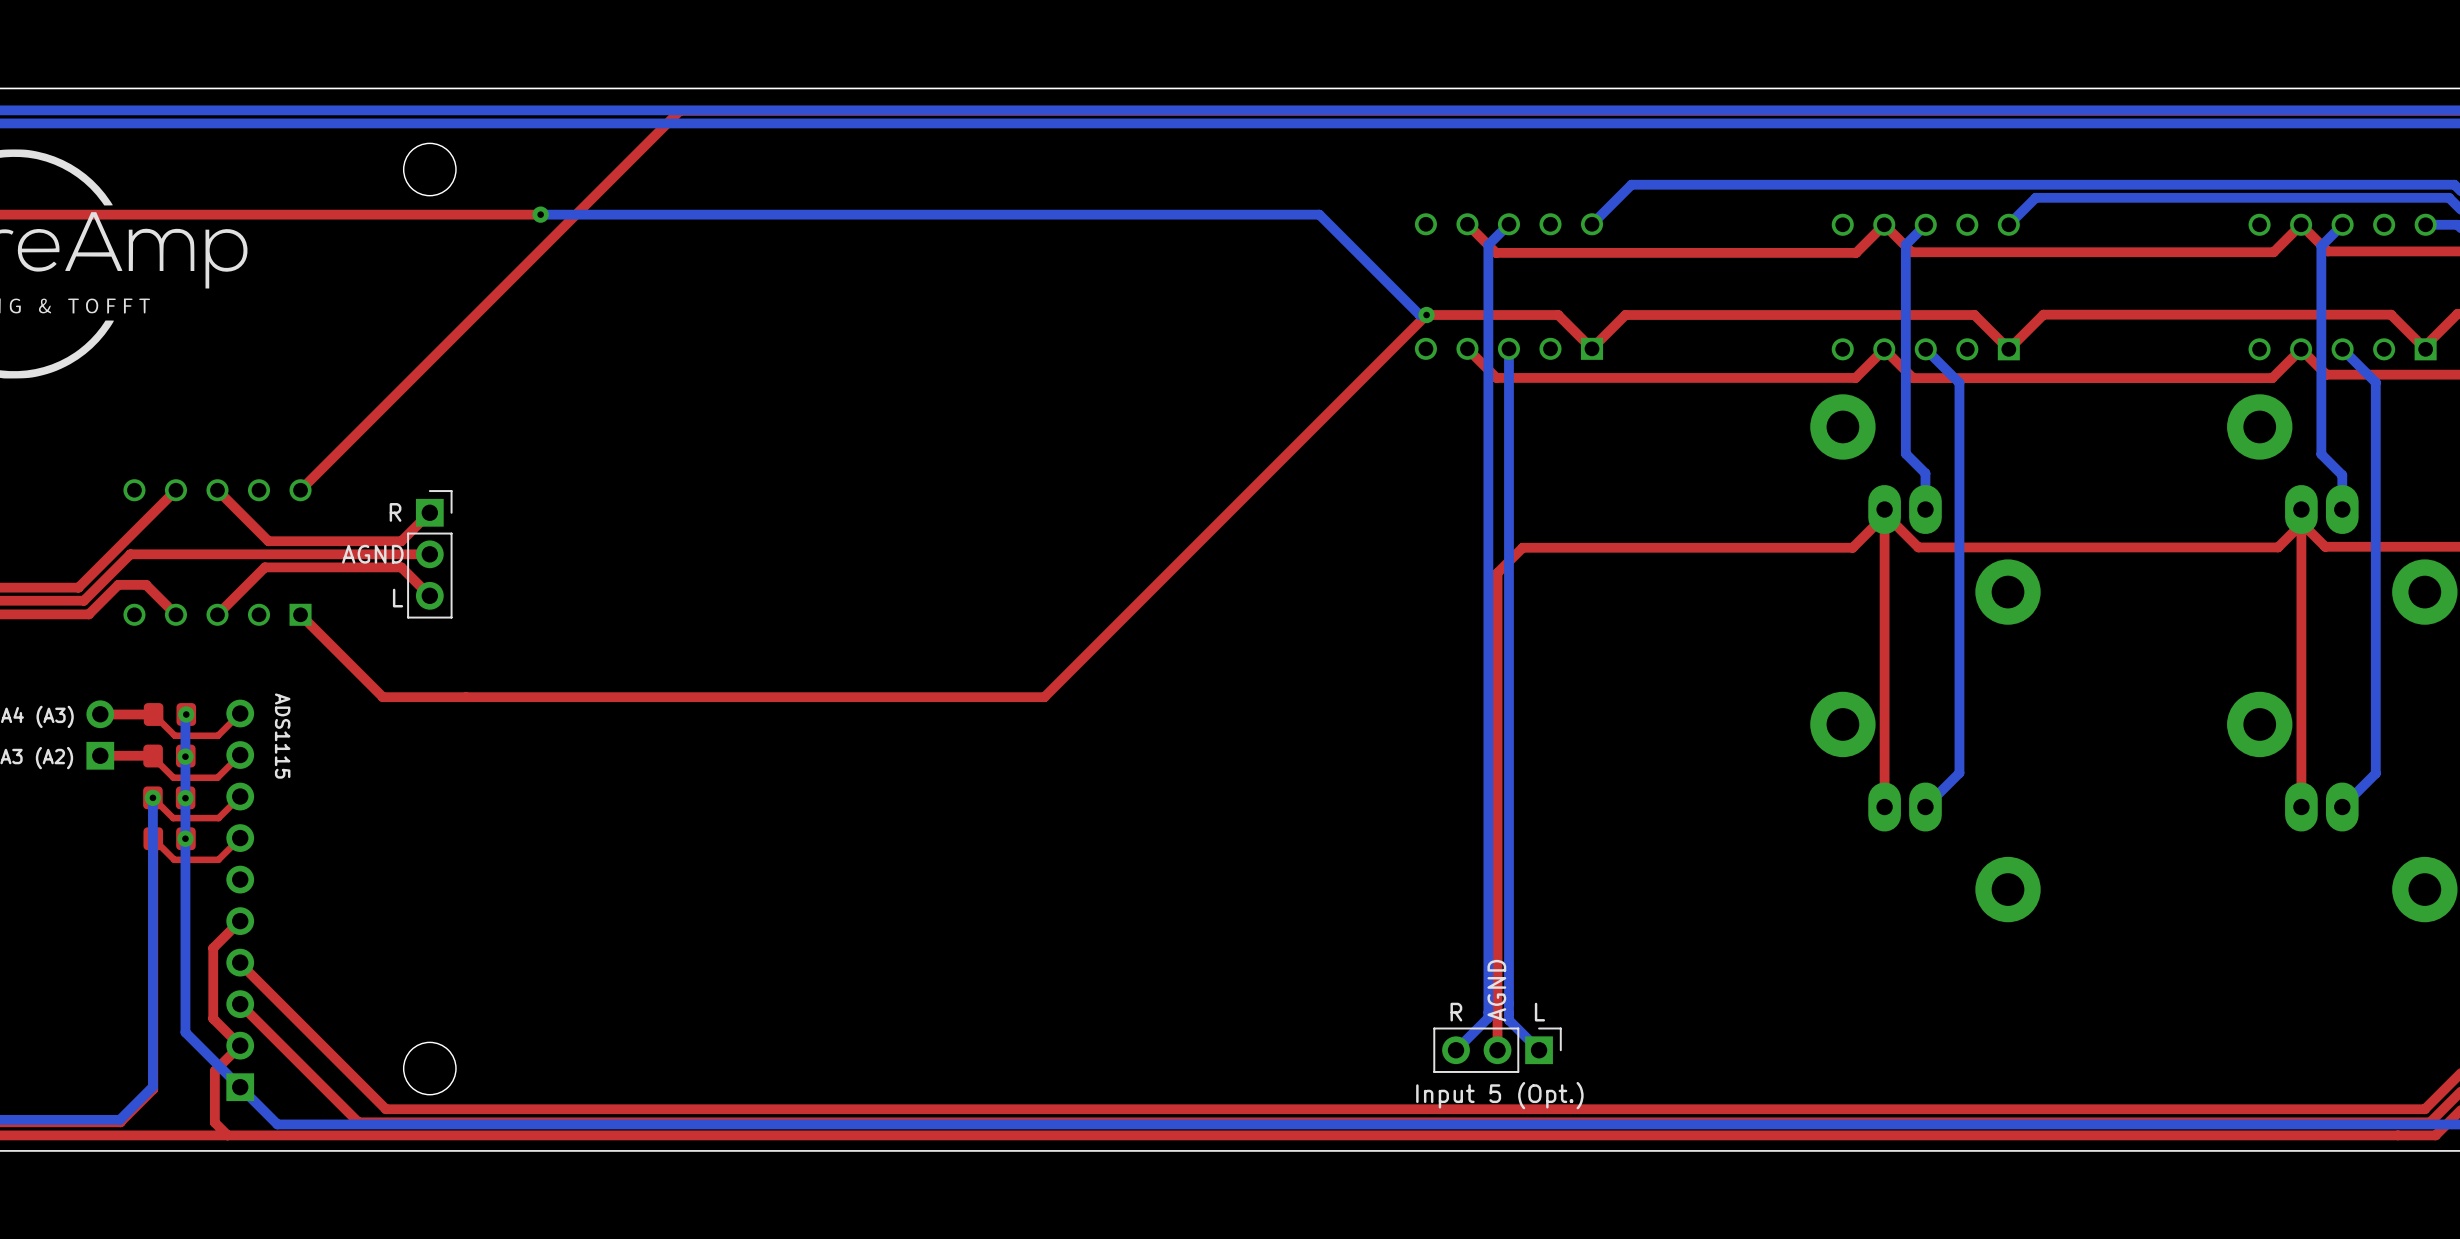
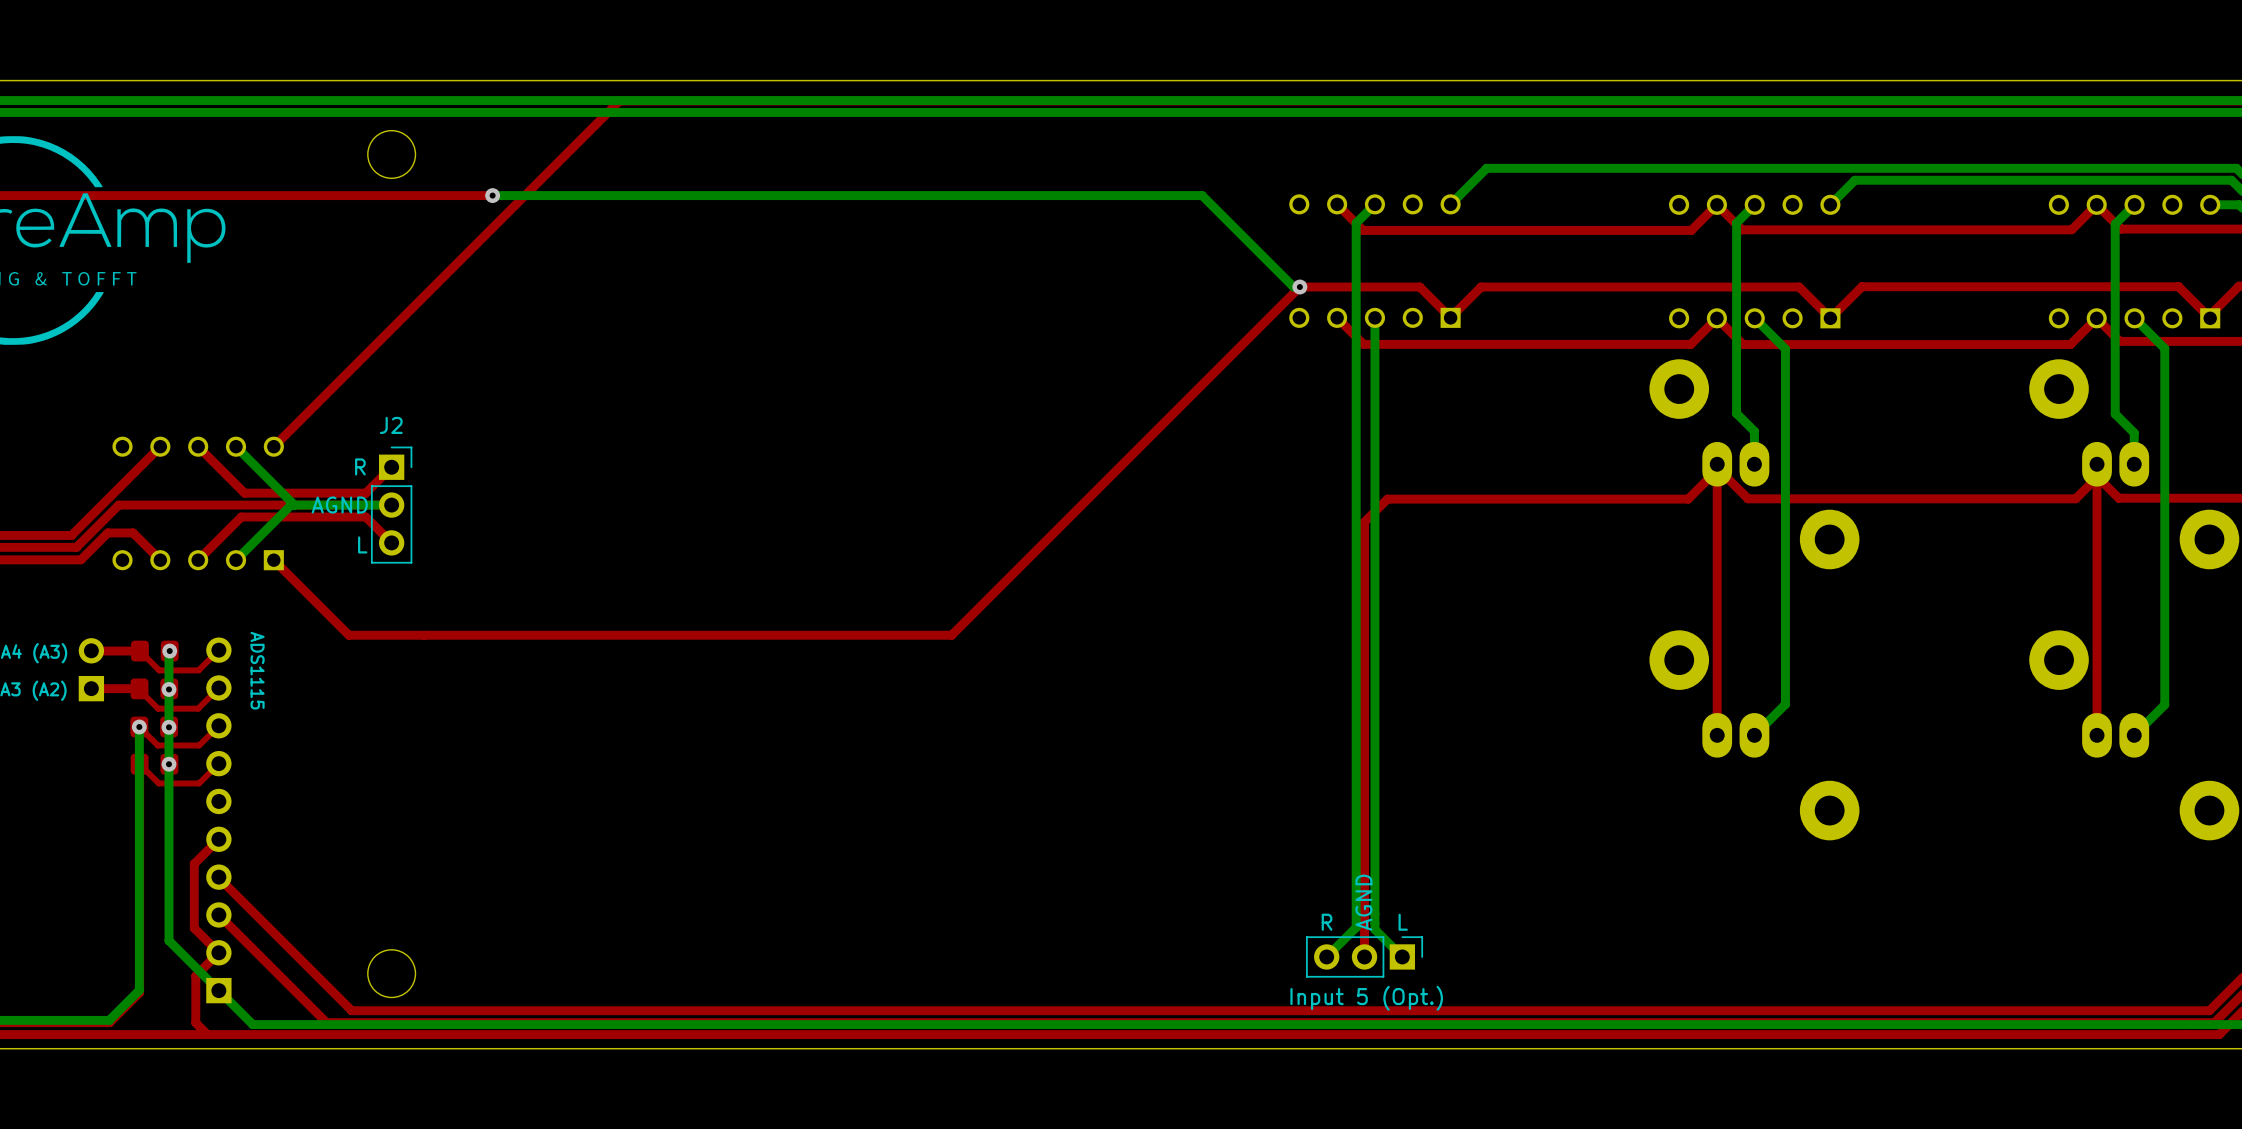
J2 name: none -> J2 (391, 425)
bottom track: none -> (236, 446) (294, 505)
bottom track: none -> (391, 505) (291, 505) (236, 560)

